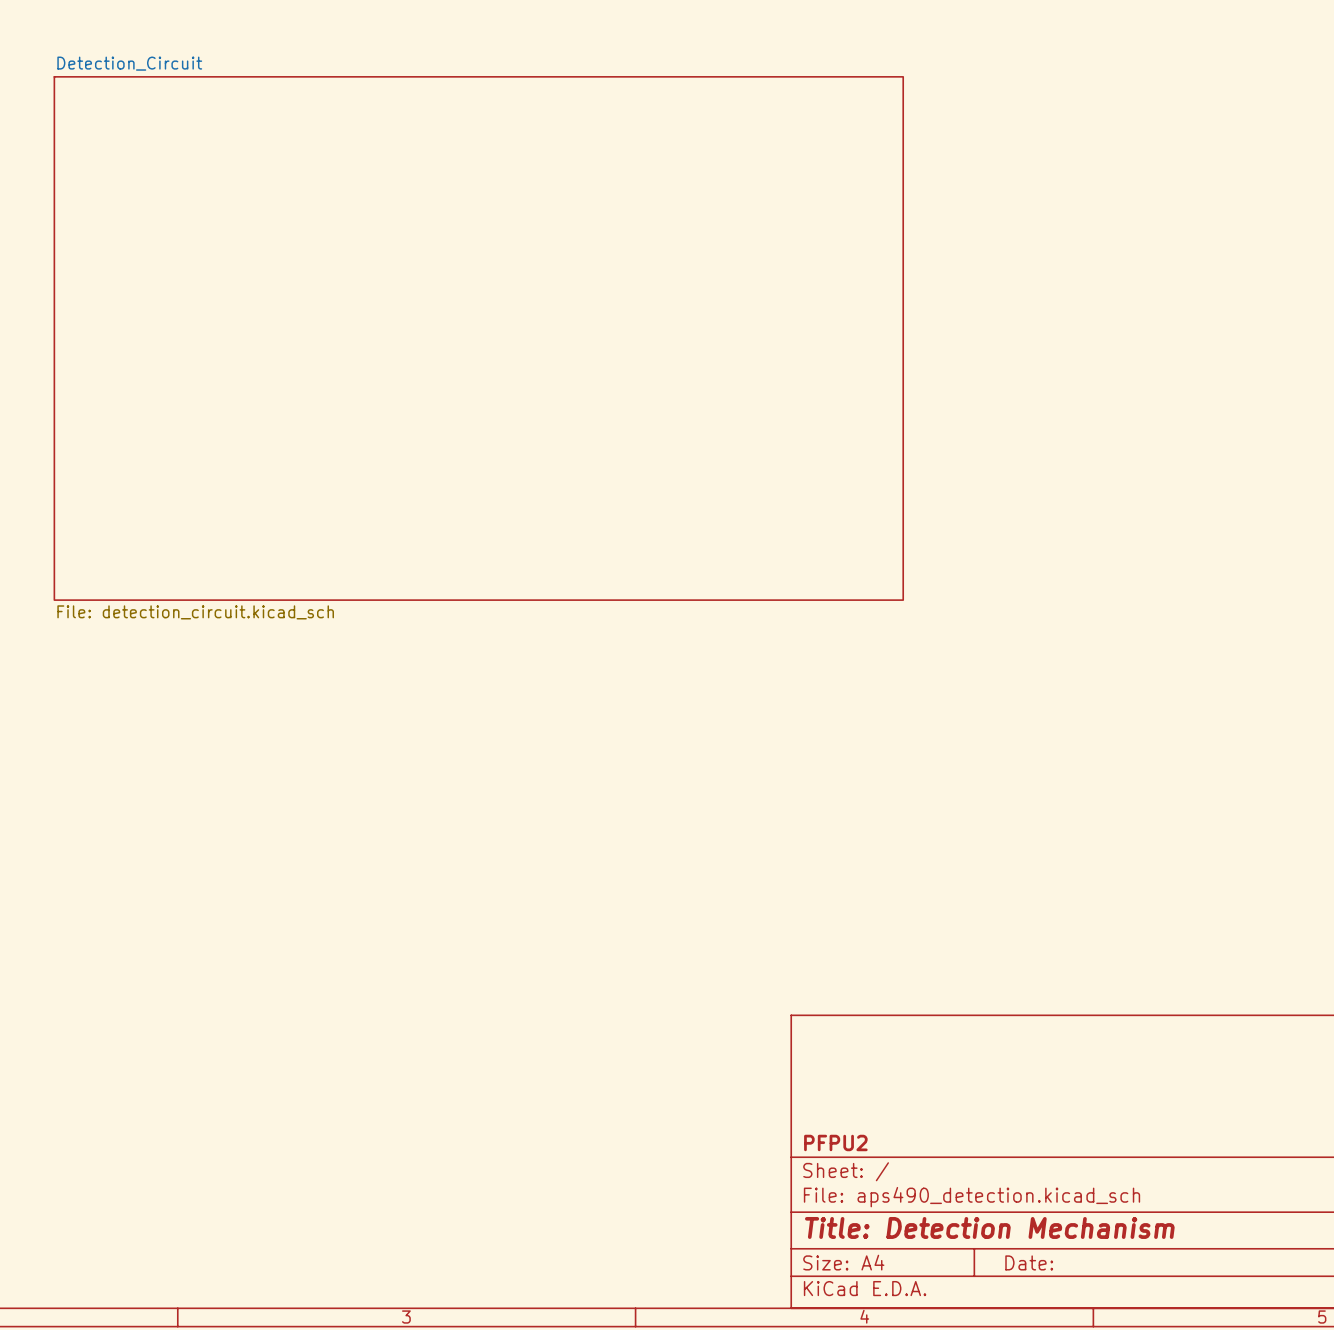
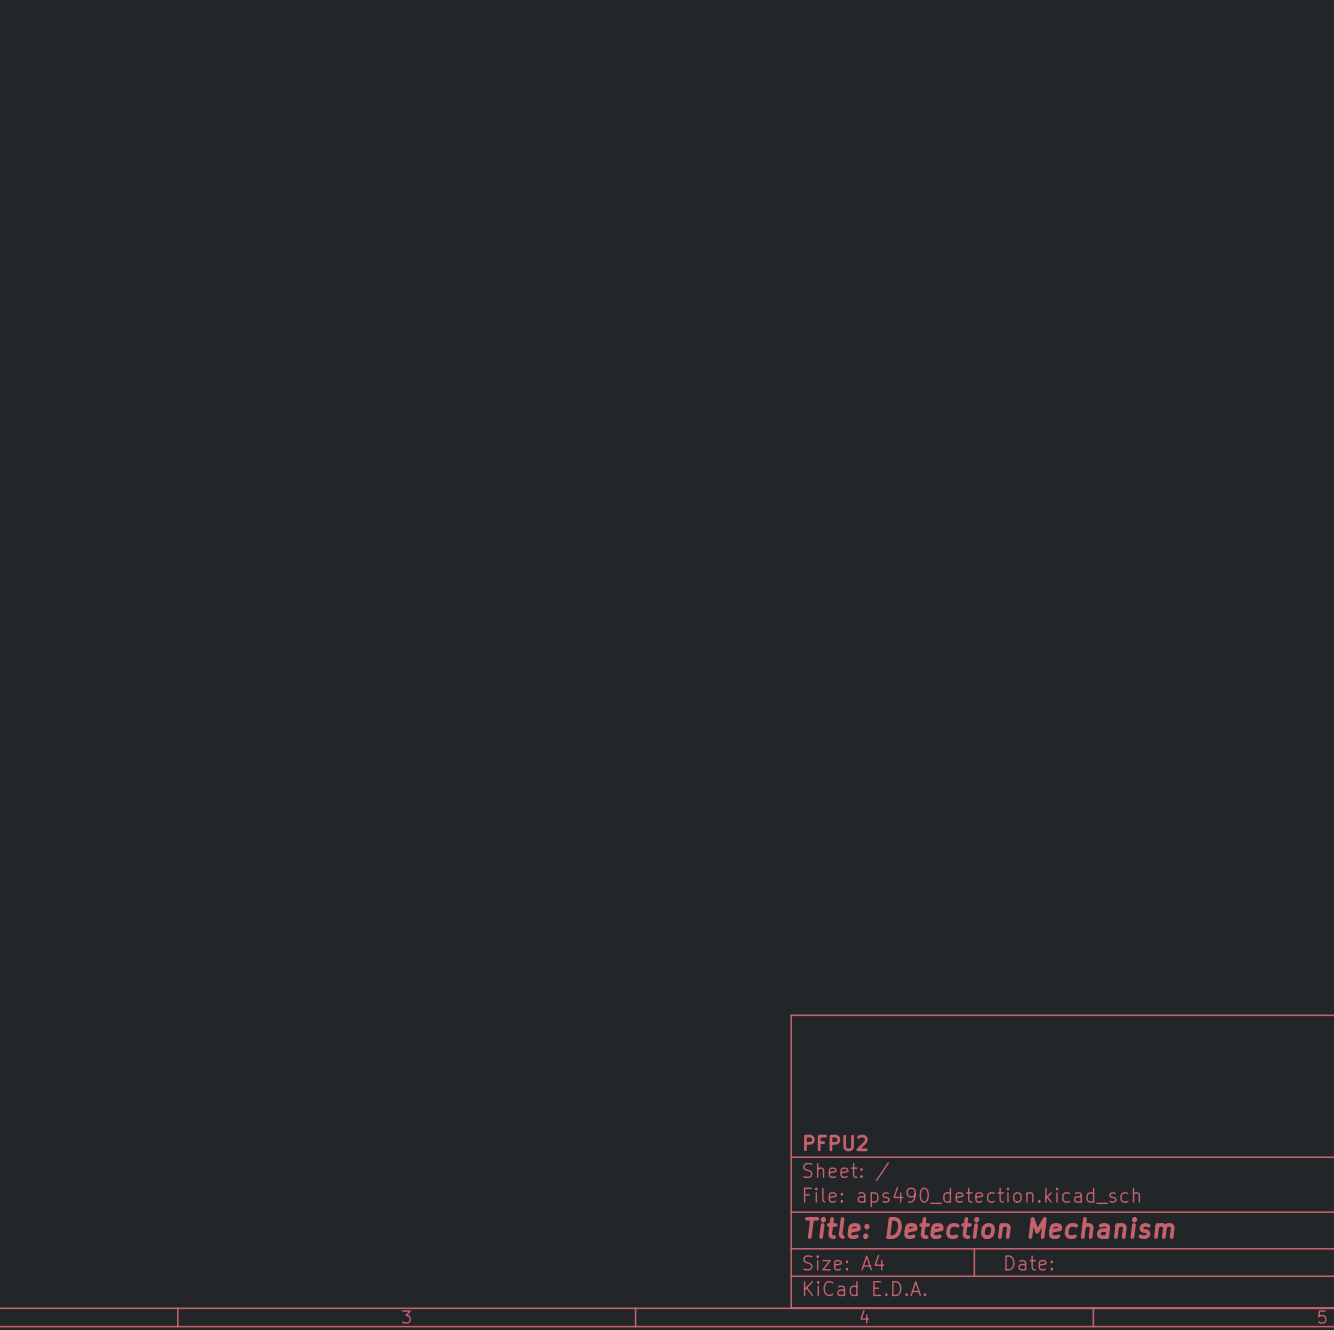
sheet Detection_Circuit: File: detection_circuit.kicad_sch (478, 338) -> none

